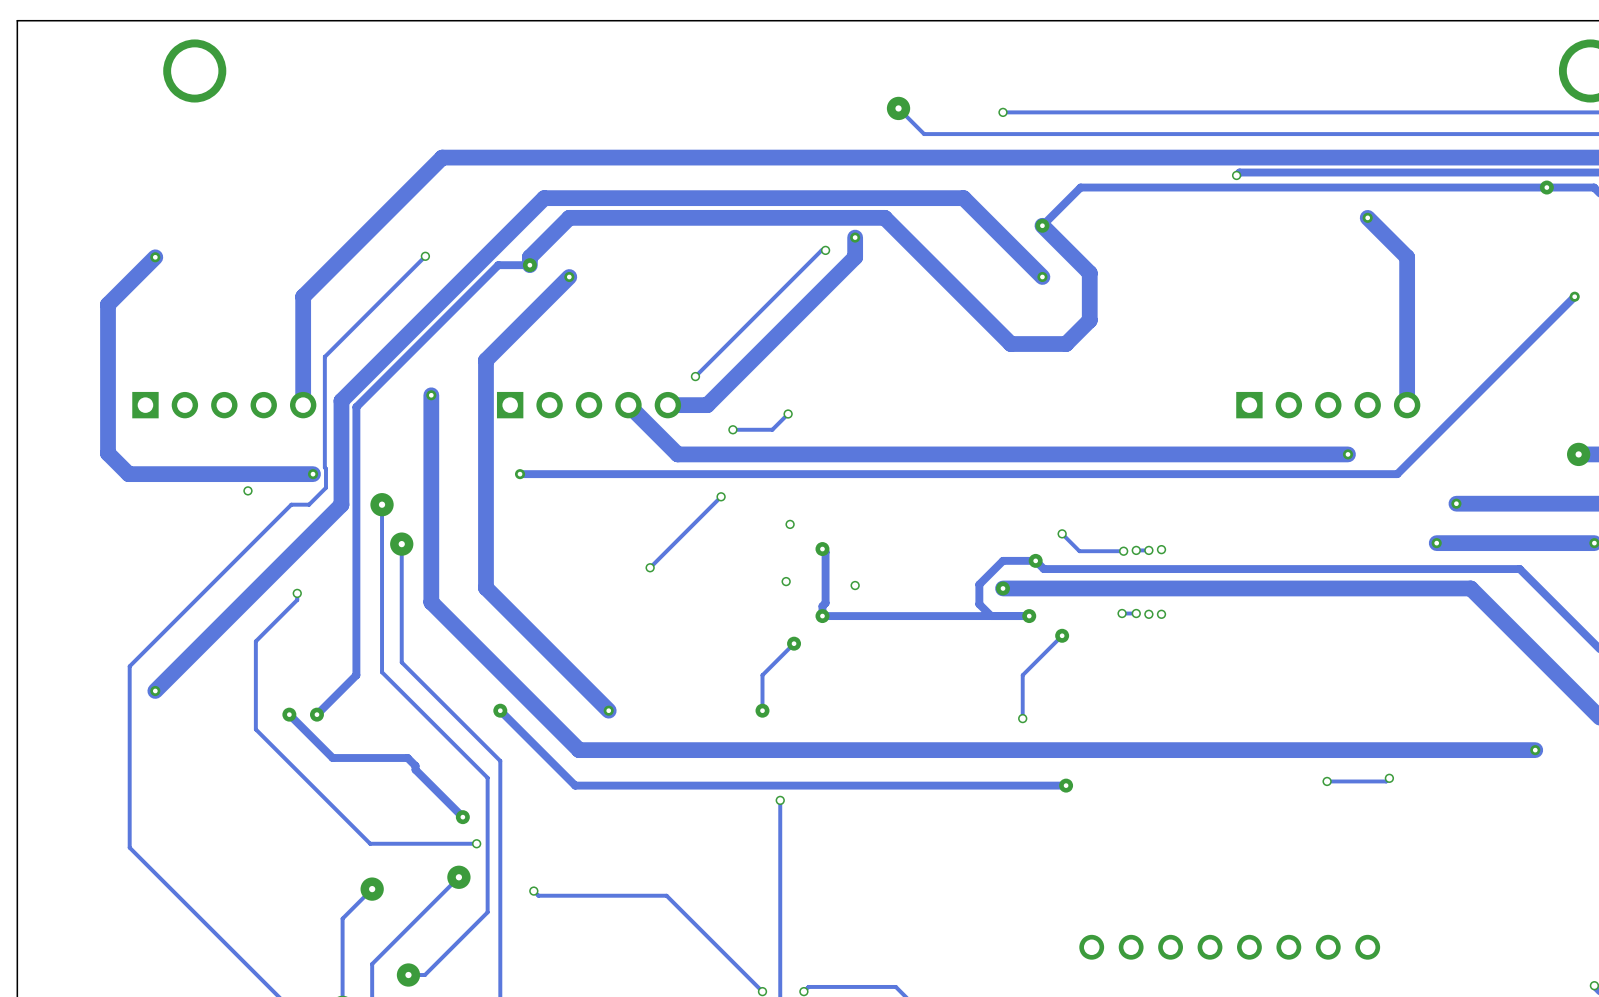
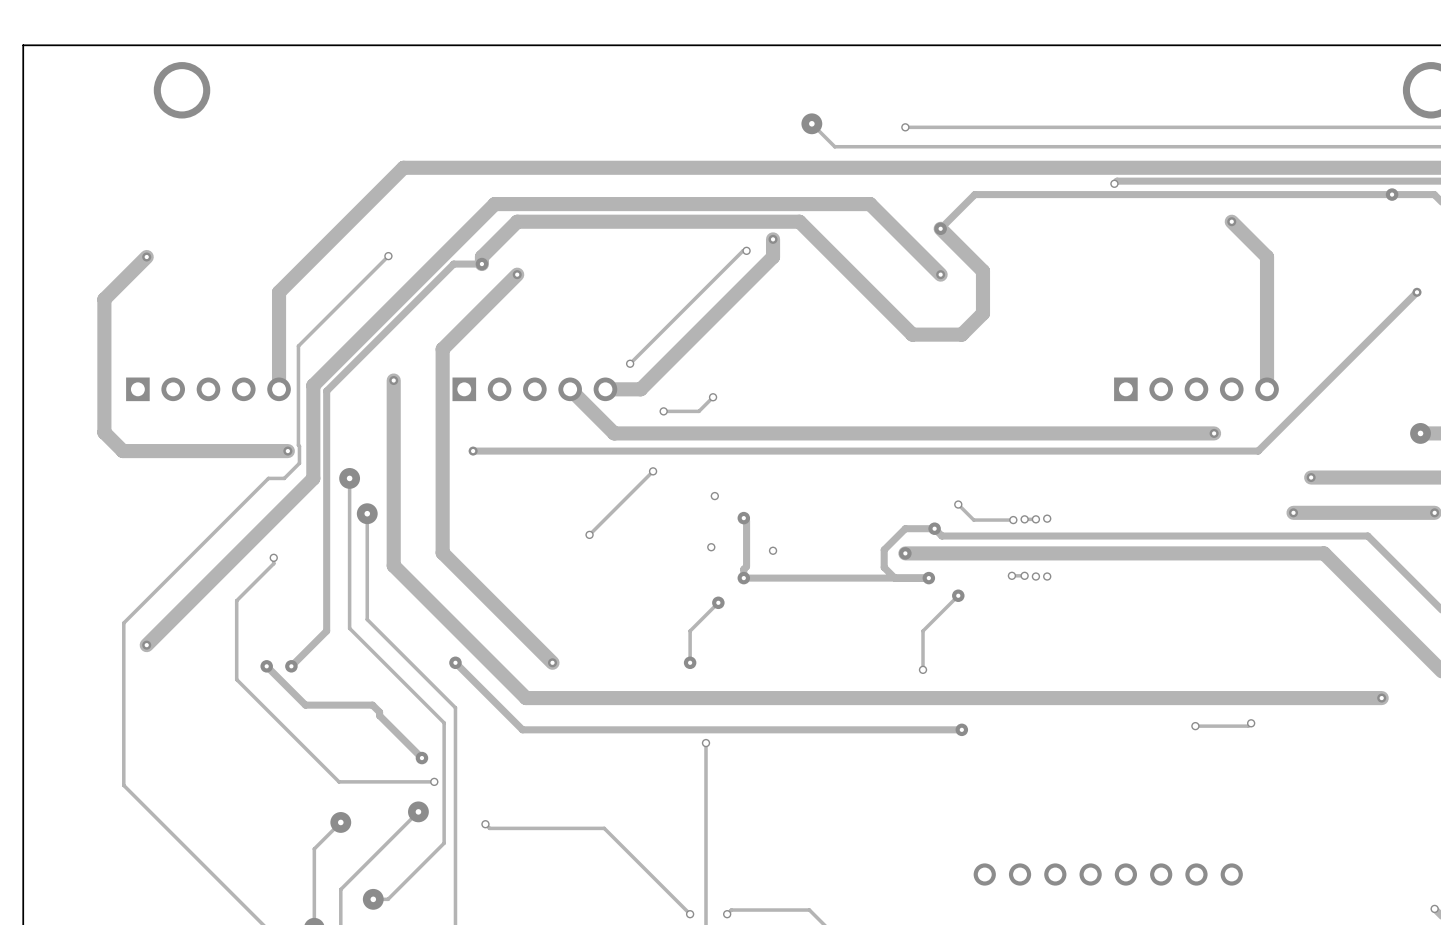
via: (247, 490) -> none

